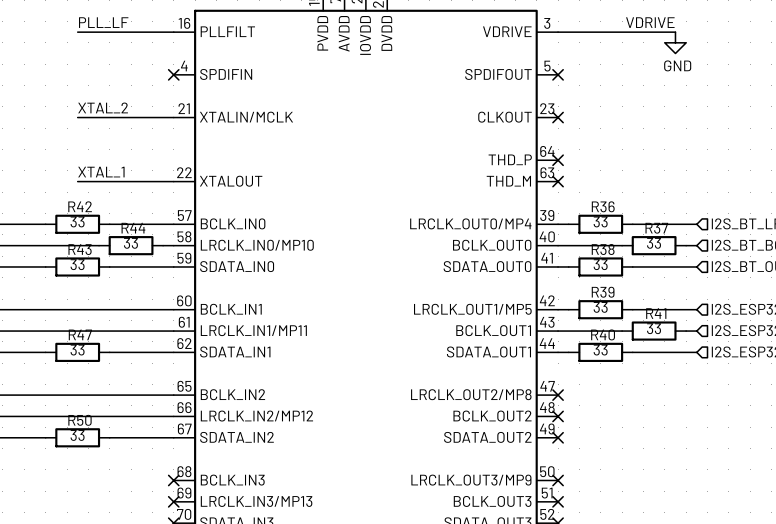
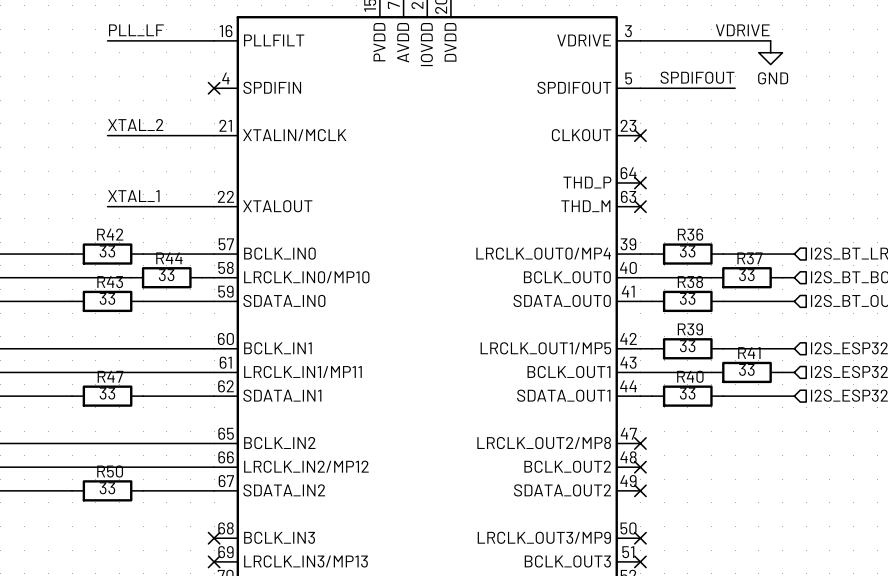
label: none -> SPDIFOUT (697, 77)
wire: none -> (640, 88) (735, 88)
no-connect mark: (558, 74) -> none

